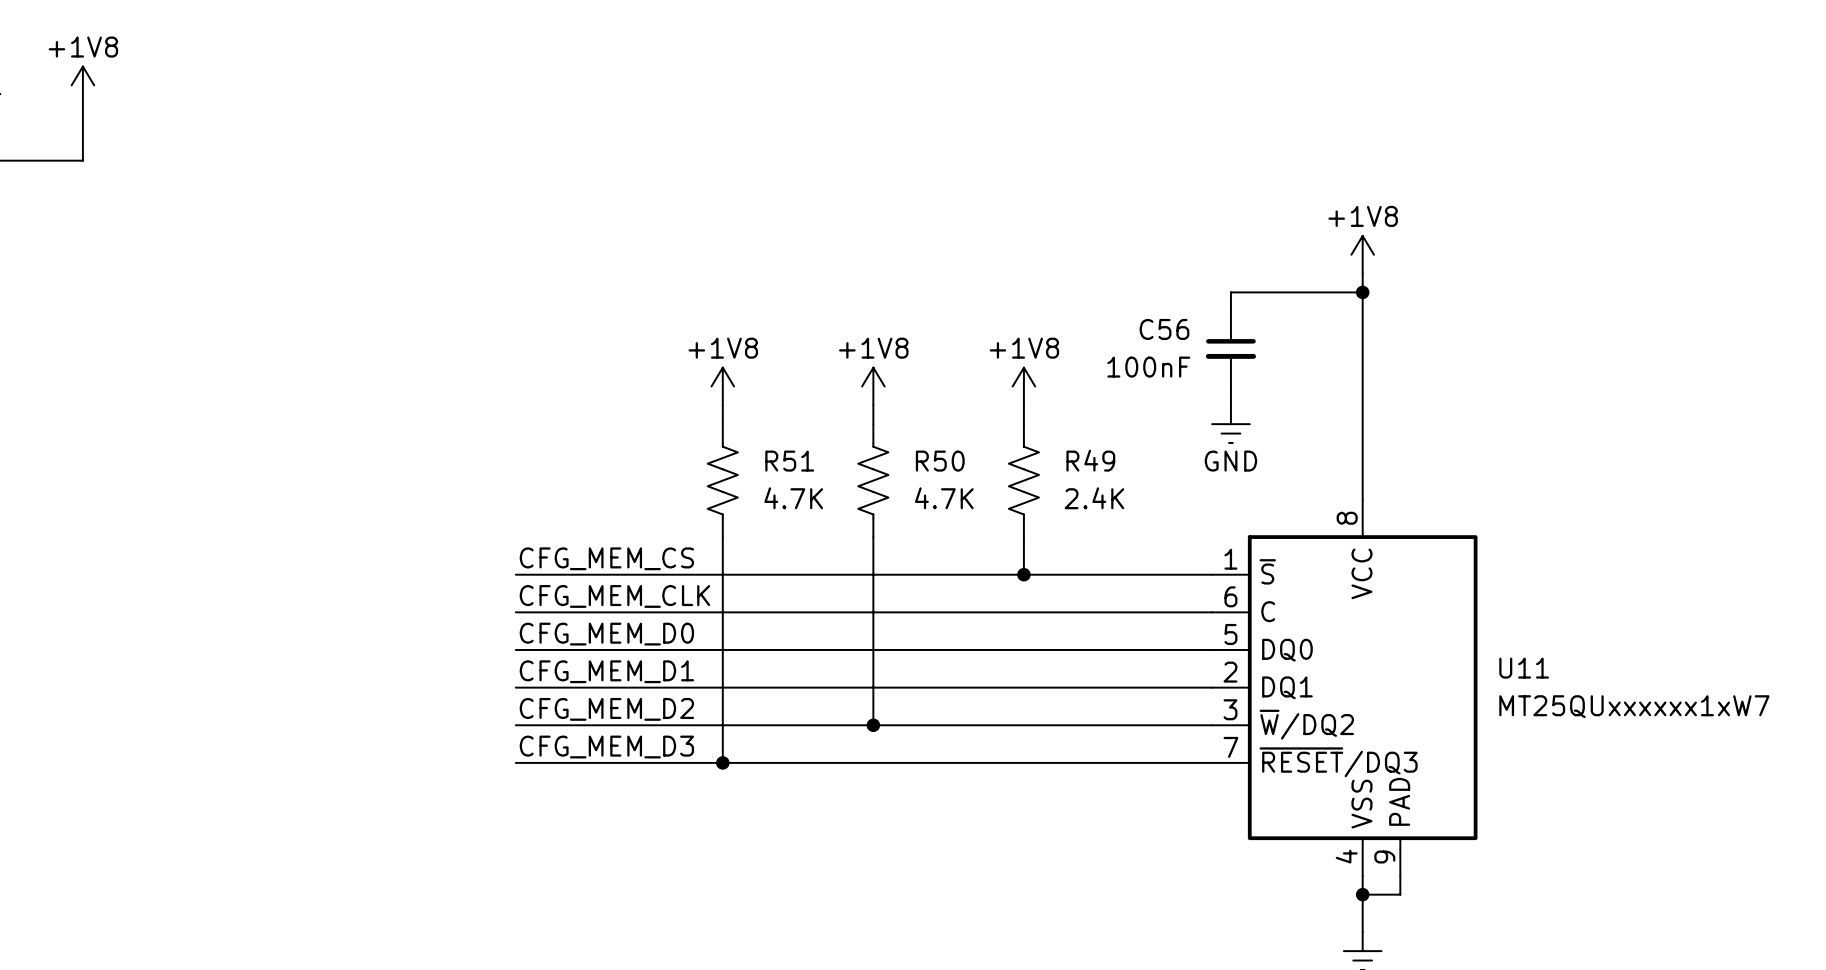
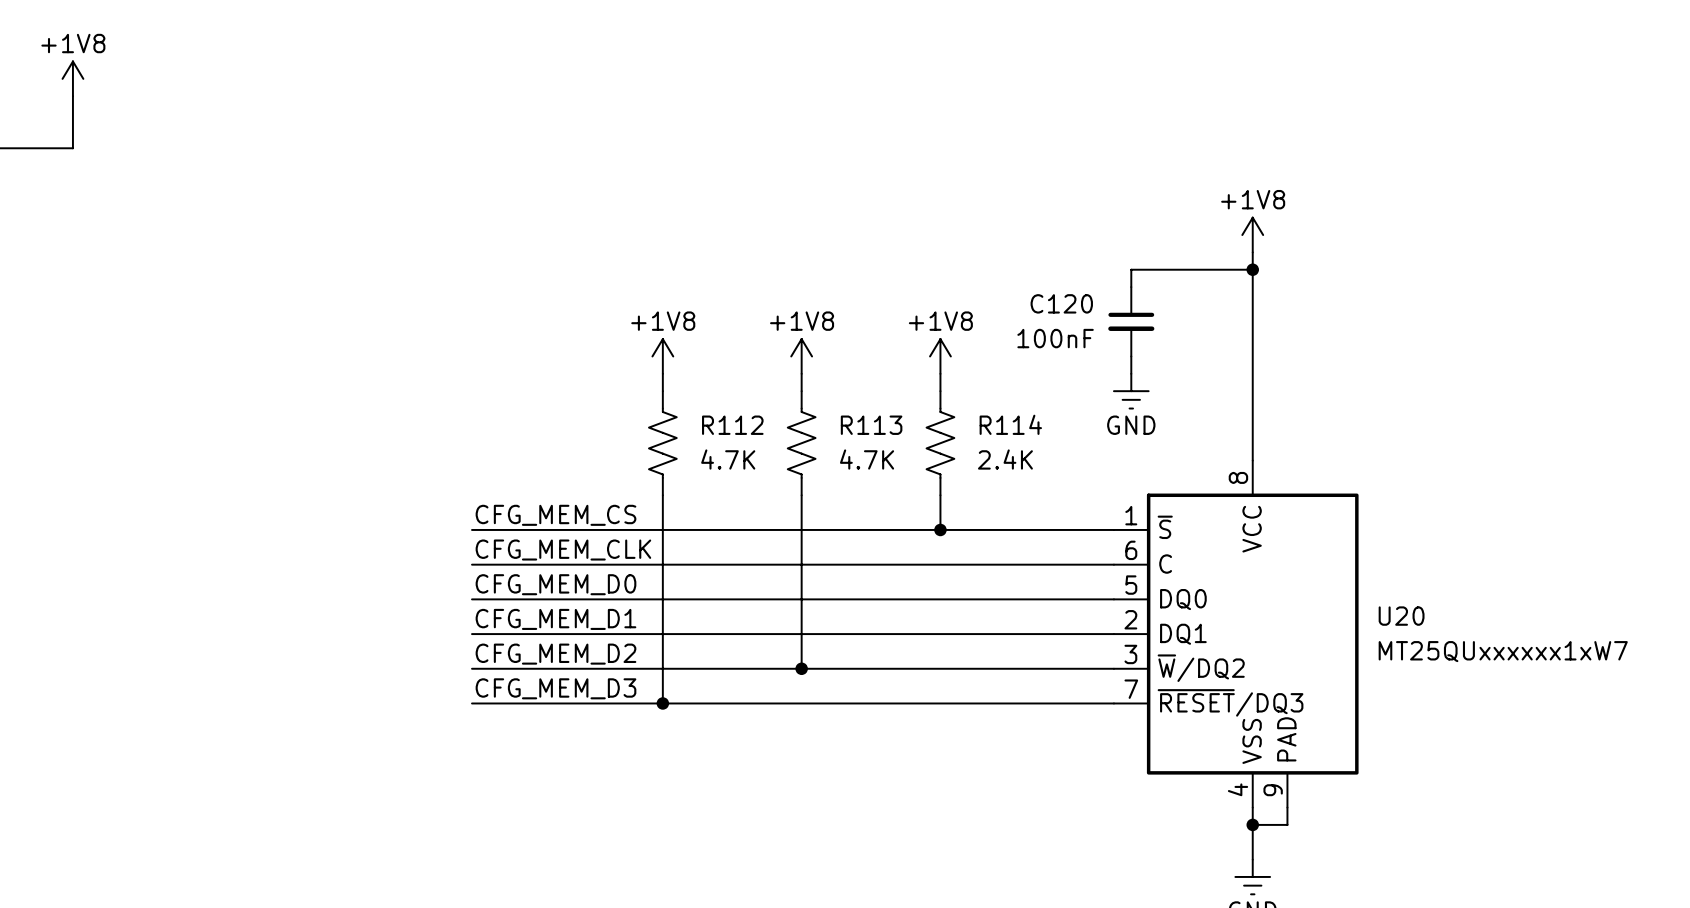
C56 name: C56 (1164, 329) -> C120 (1061, 303)
R49 name: R49 (1090, 460) -> R114 (1010, 424)
R51 name: R51 (789, 461) -> R112 (732, 425)
R50 name: R50 (940, 461) -> R113 (871, 425)
U11 name: U11 (1524, 668) -> U20 (1401, 616)

